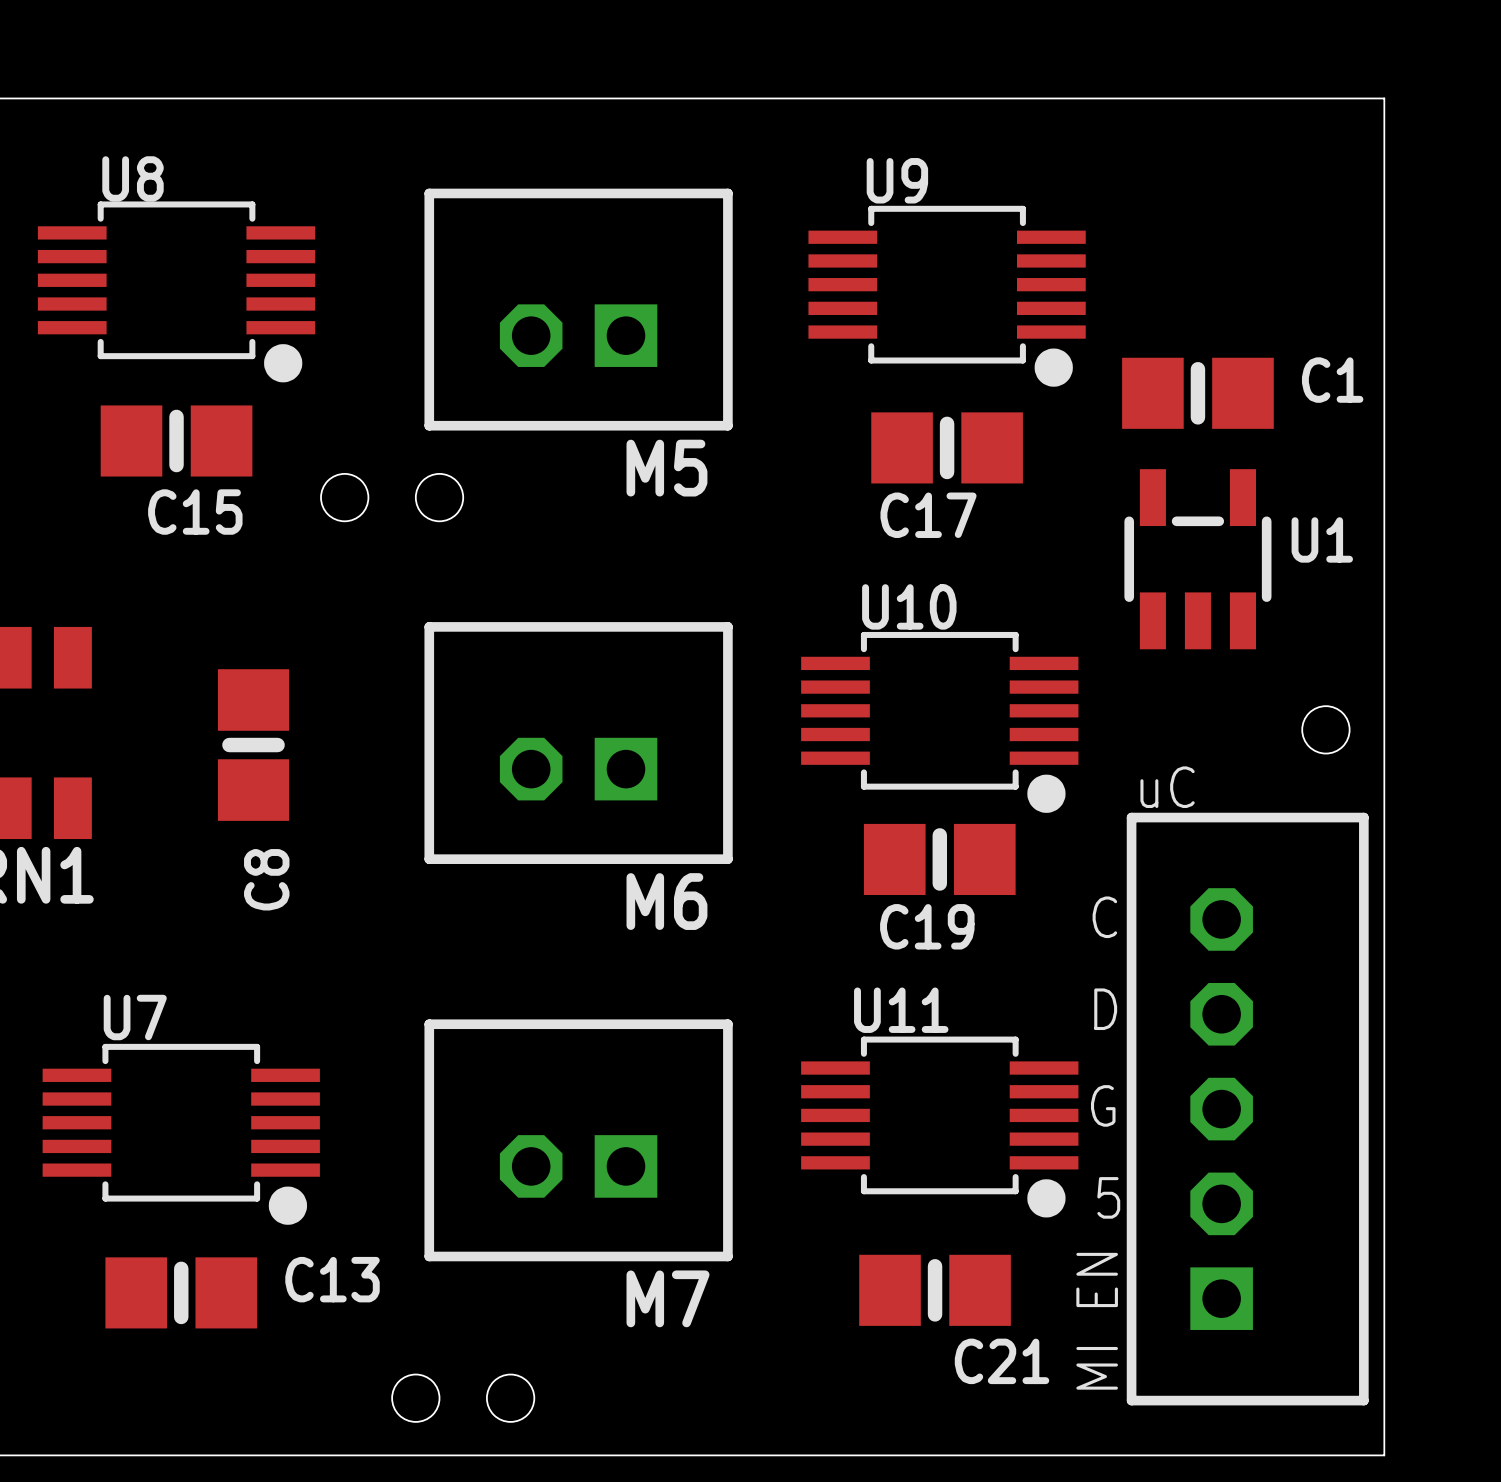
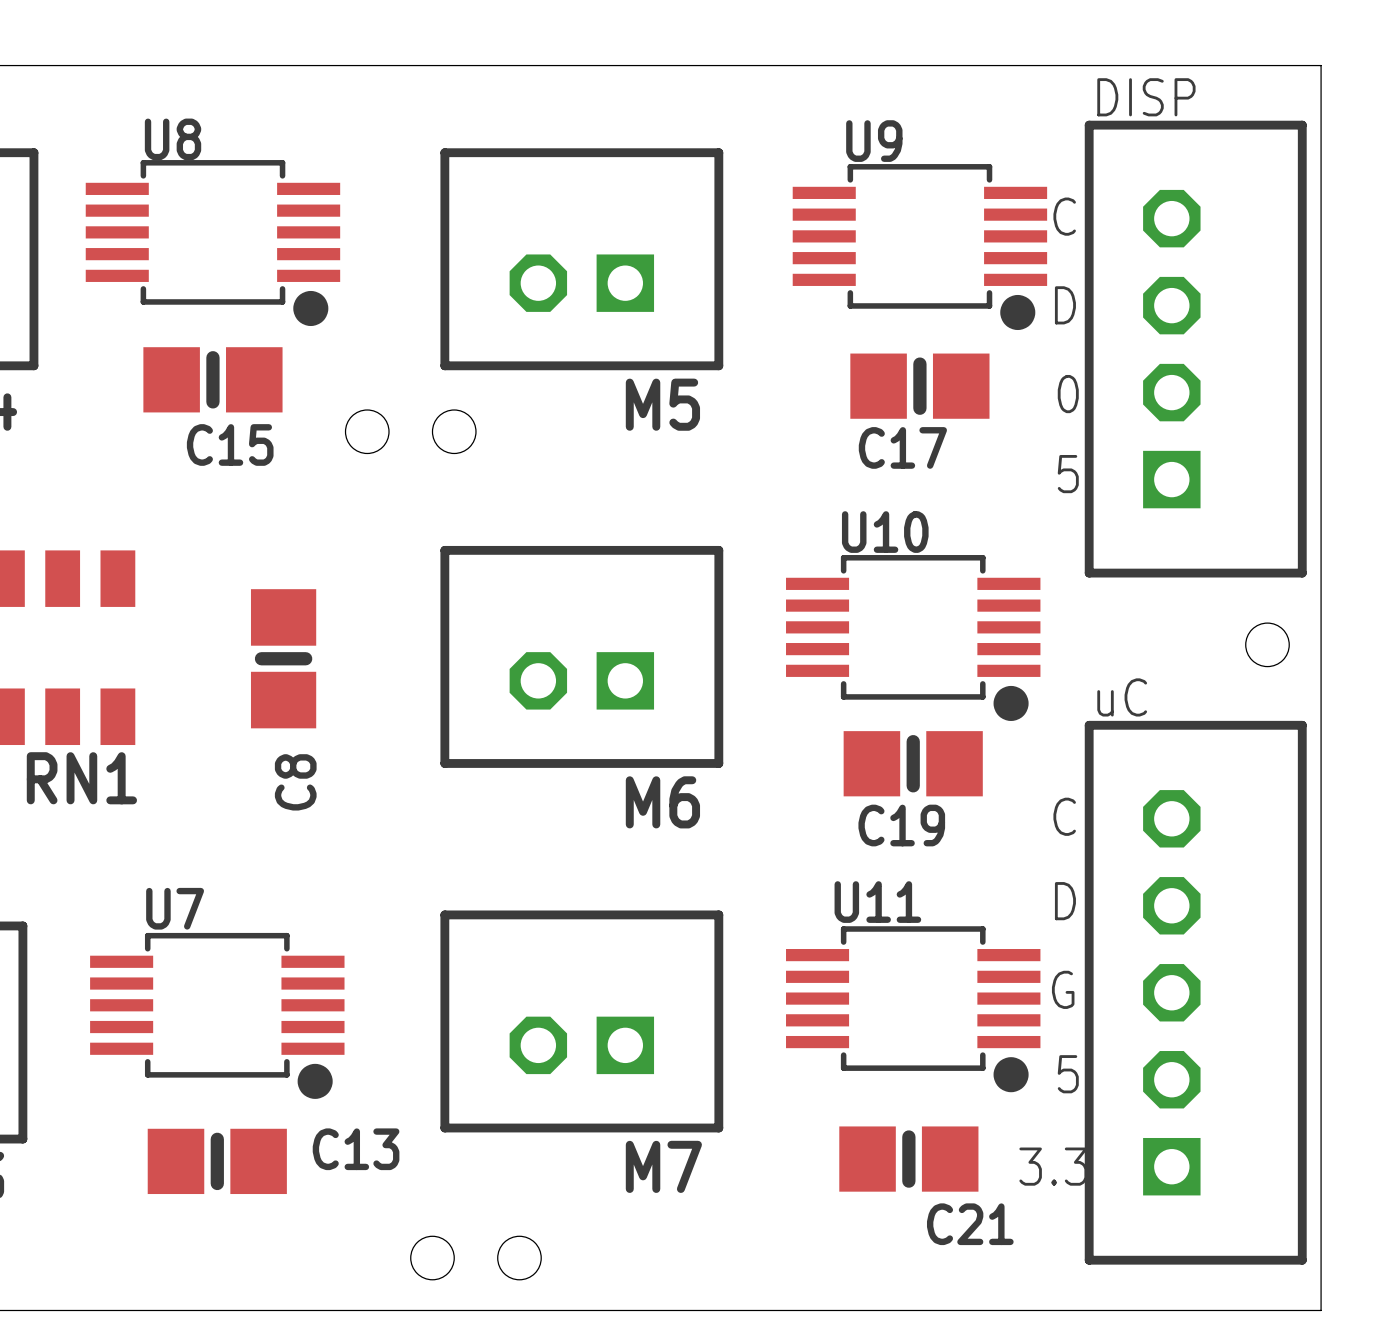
text: none -> DISP (1146, 97)
text: none -> C (1064, 216)
text: none -> D (1065, 305)
C1: (1197, 393) -> none
part: none -> (1195, 349)
text: none -> 0 (1068, 394)
text: none -> 5 (1068, 474)
U1: (1197, 559) -> none
text: none -> 3.3 (1053, 1166)
text: MI EN (1097, 1321) -> none

